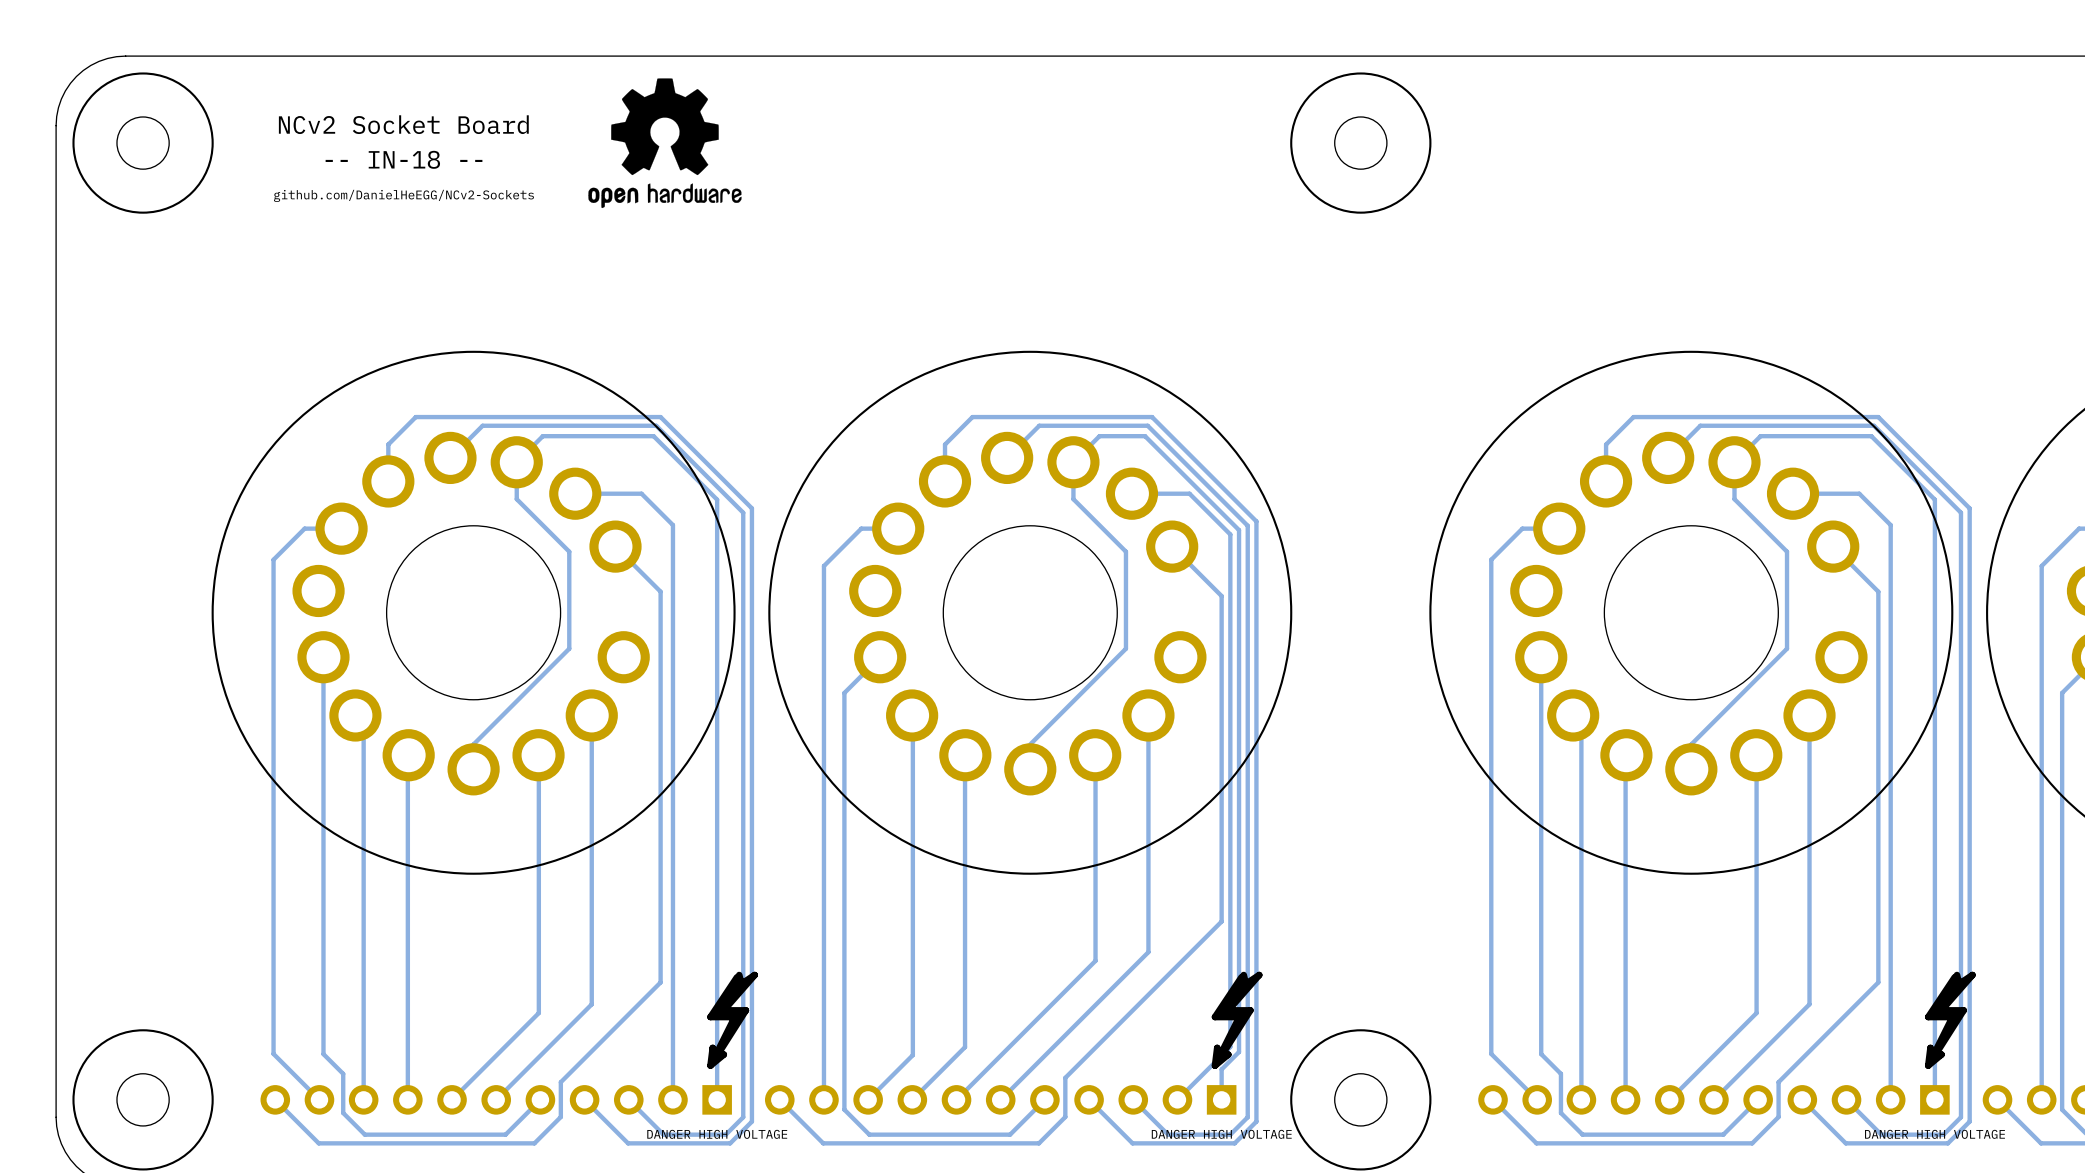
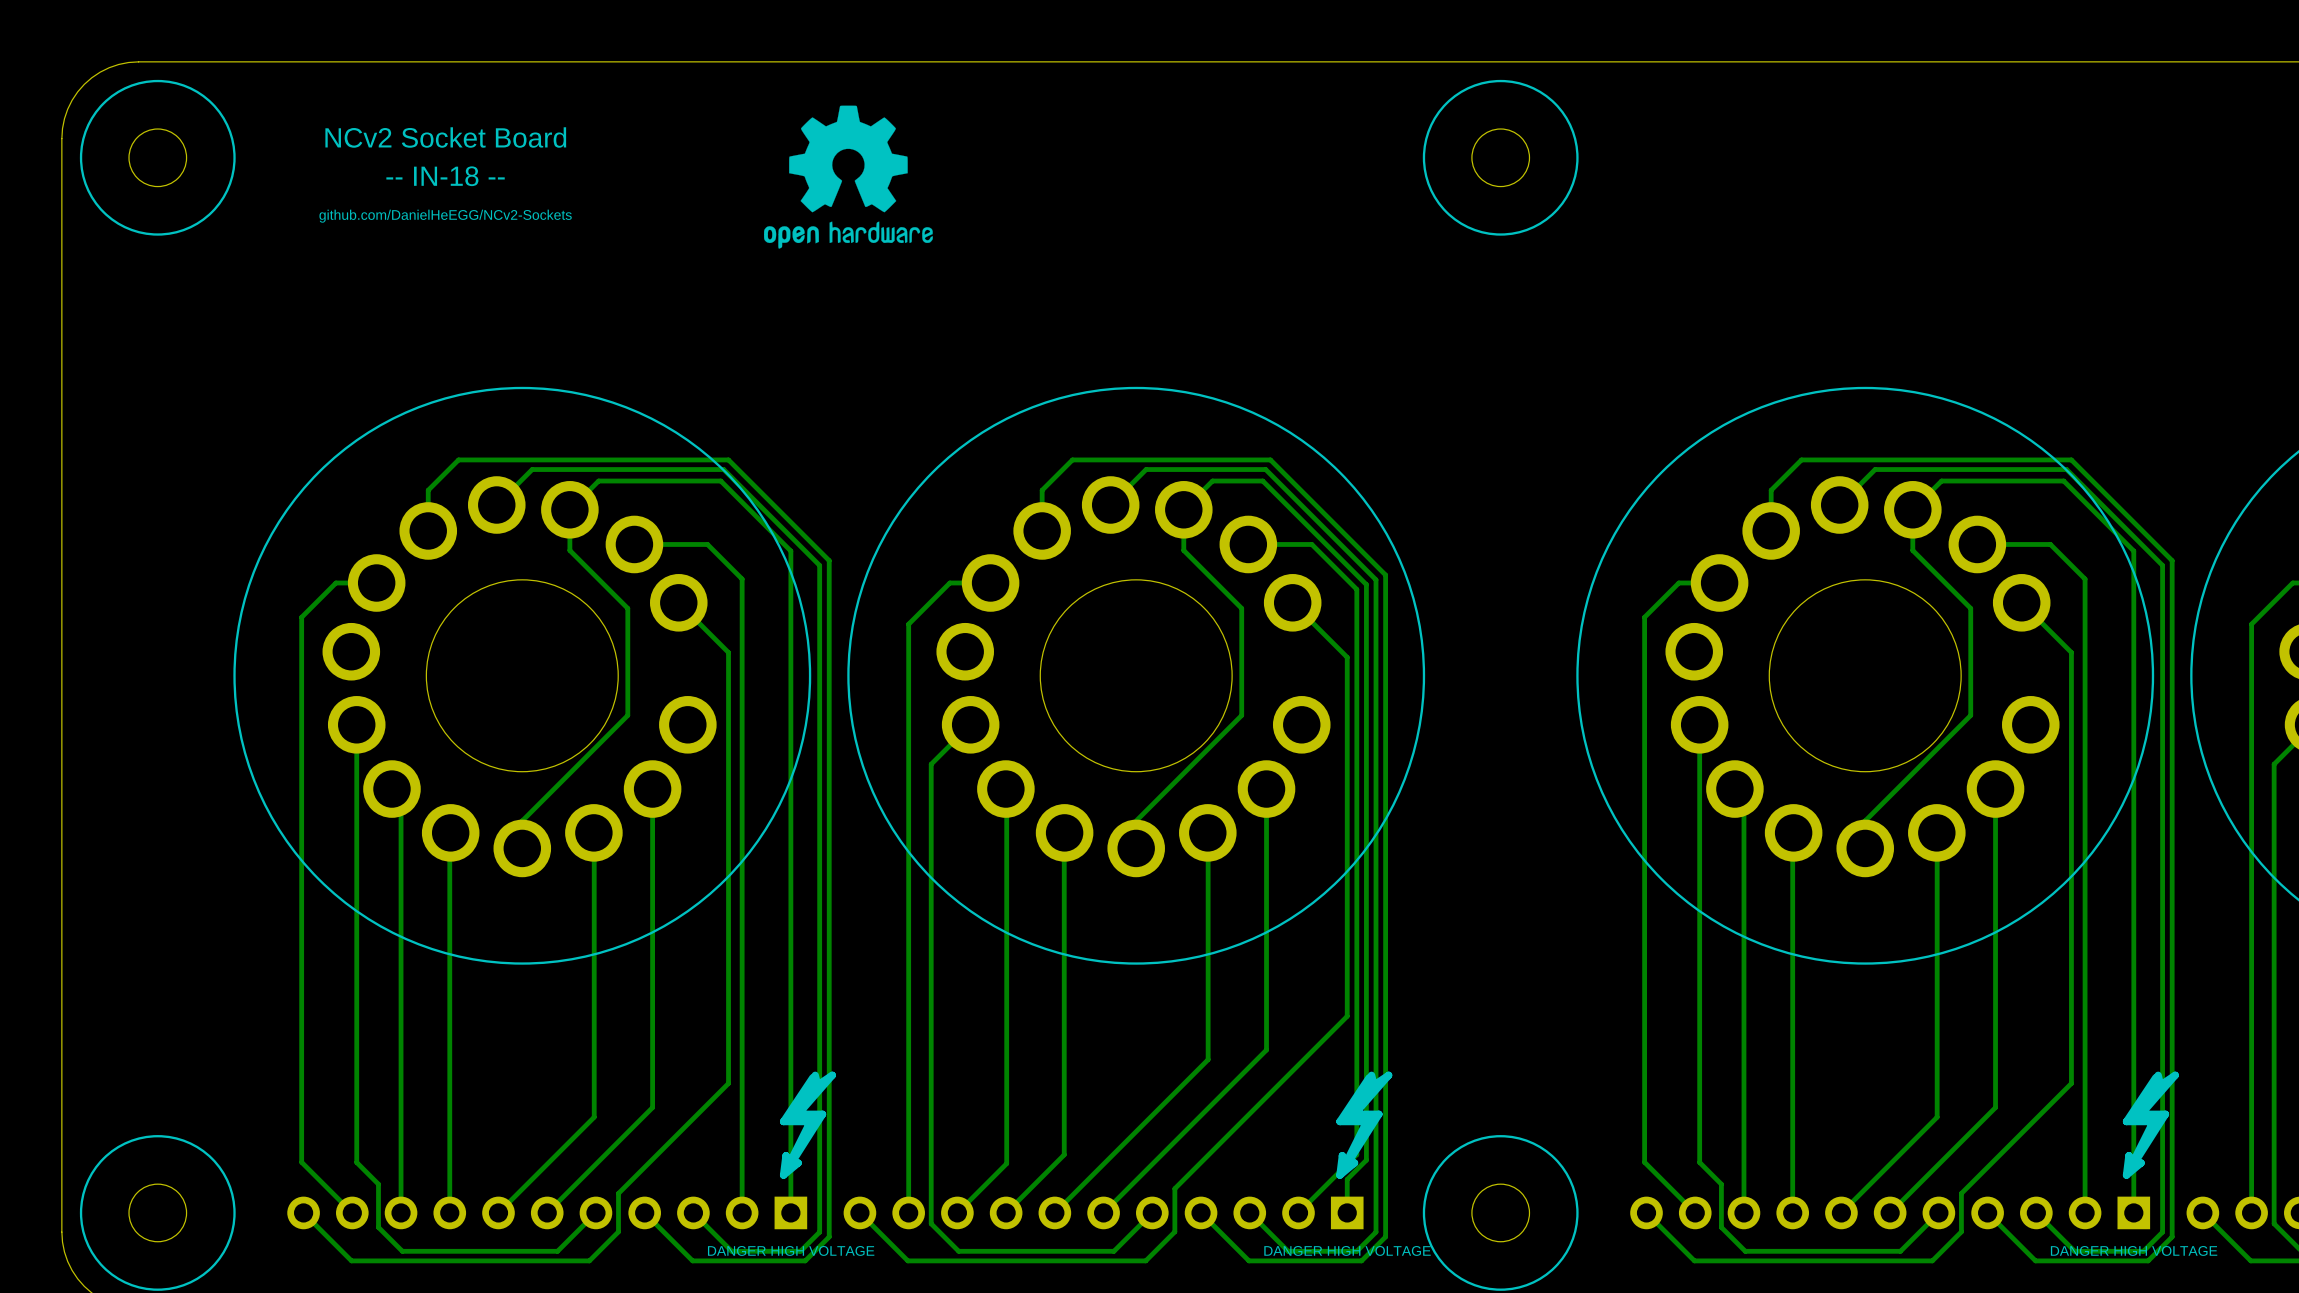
drawing position: (664, 143) -> (848, 177)

